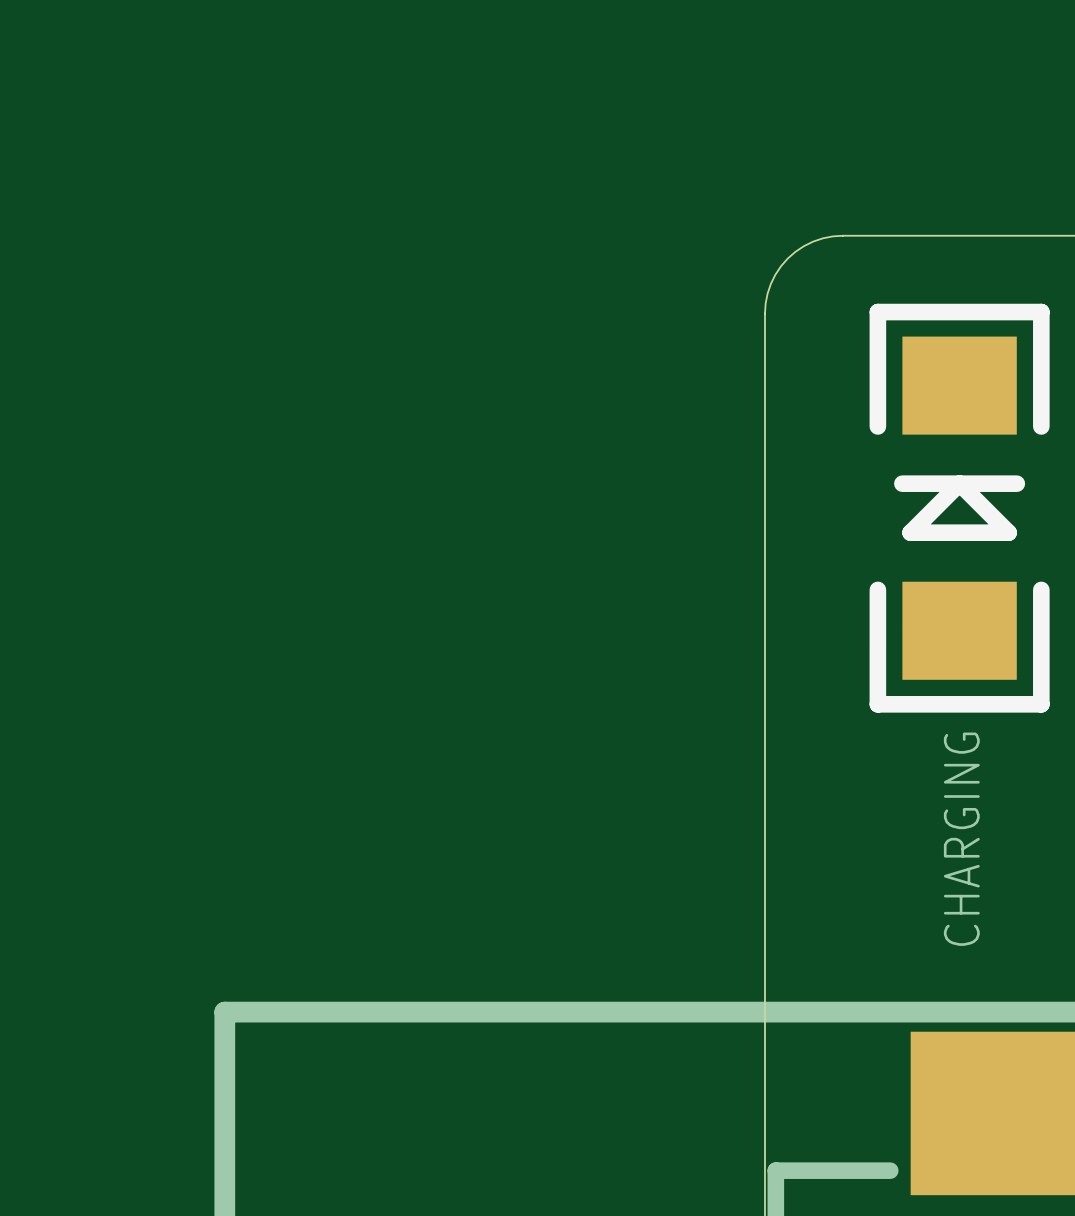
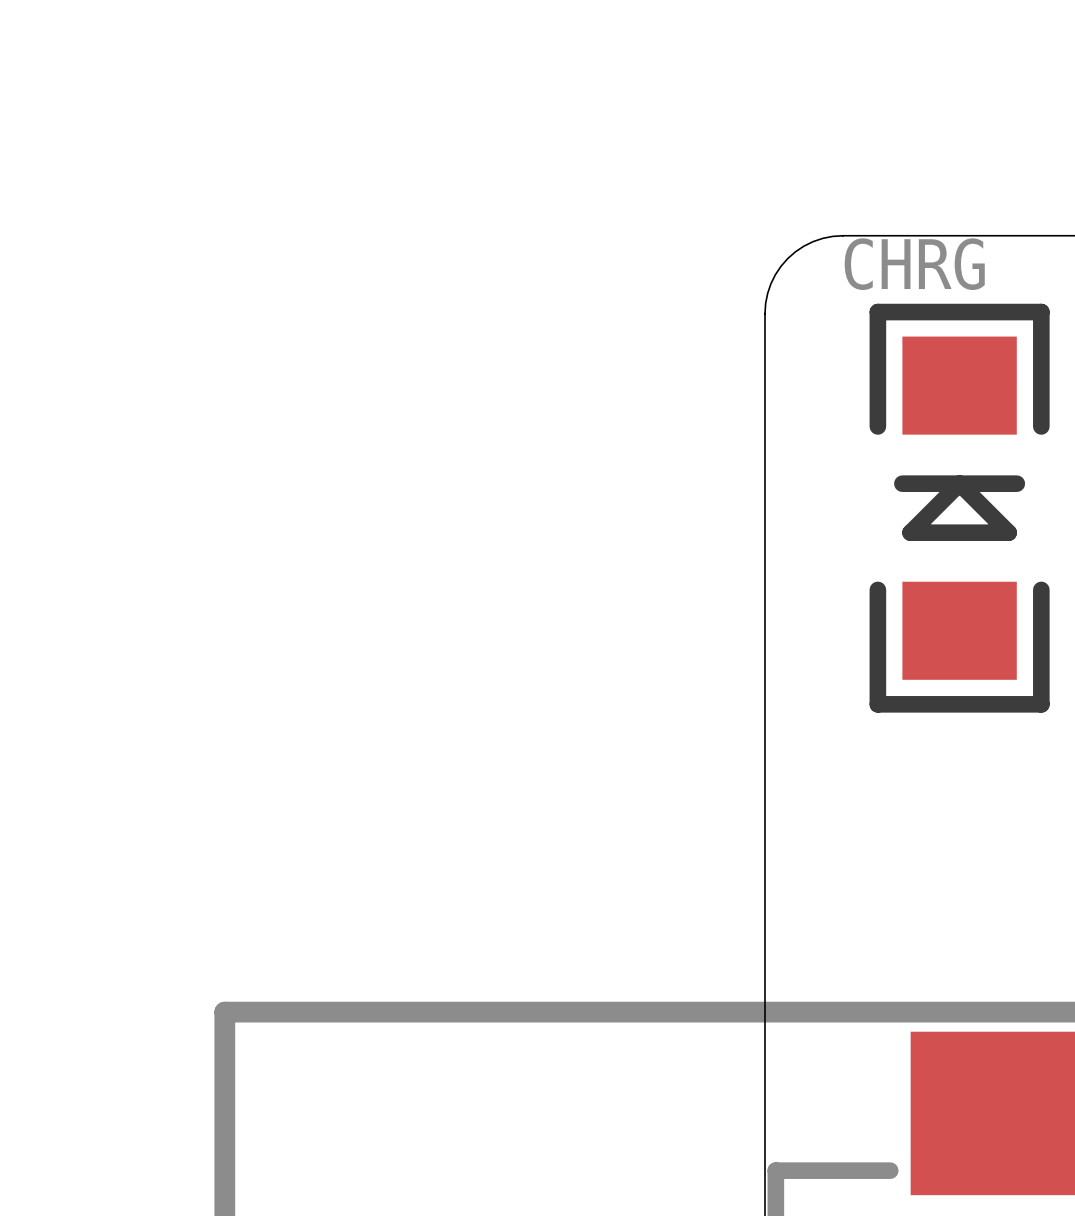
part value: CHARGING (961, 839) -> CHRG (914, 264)

